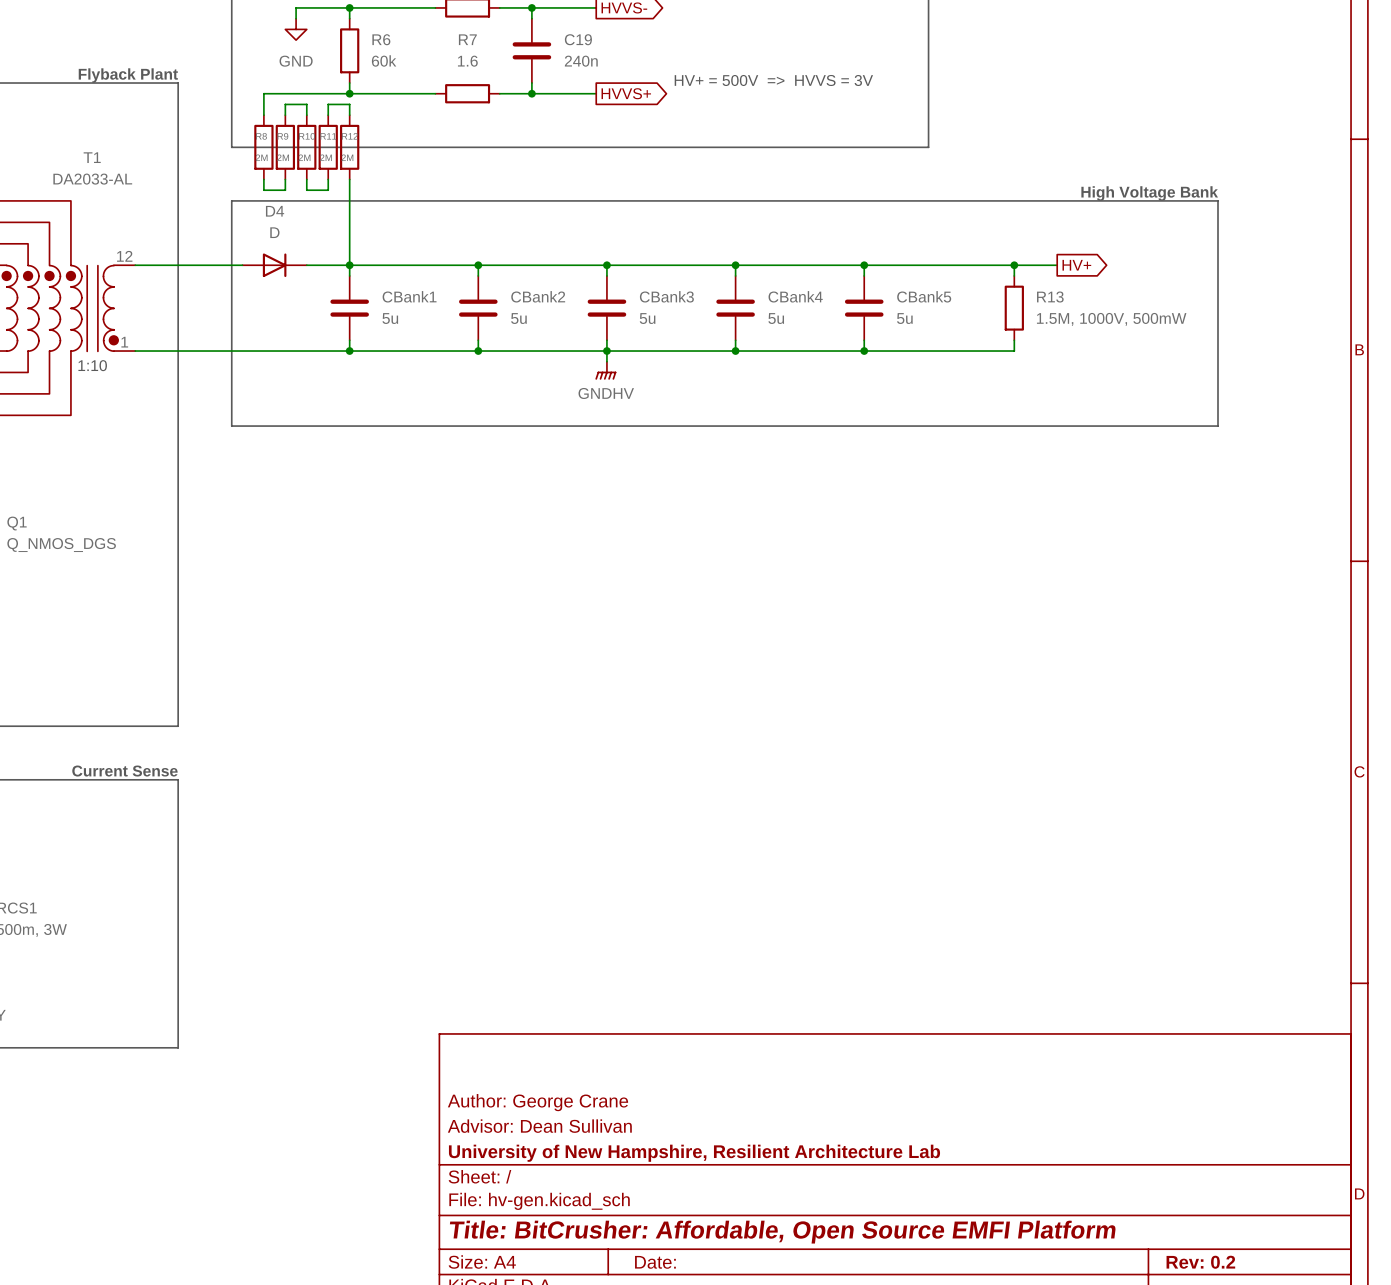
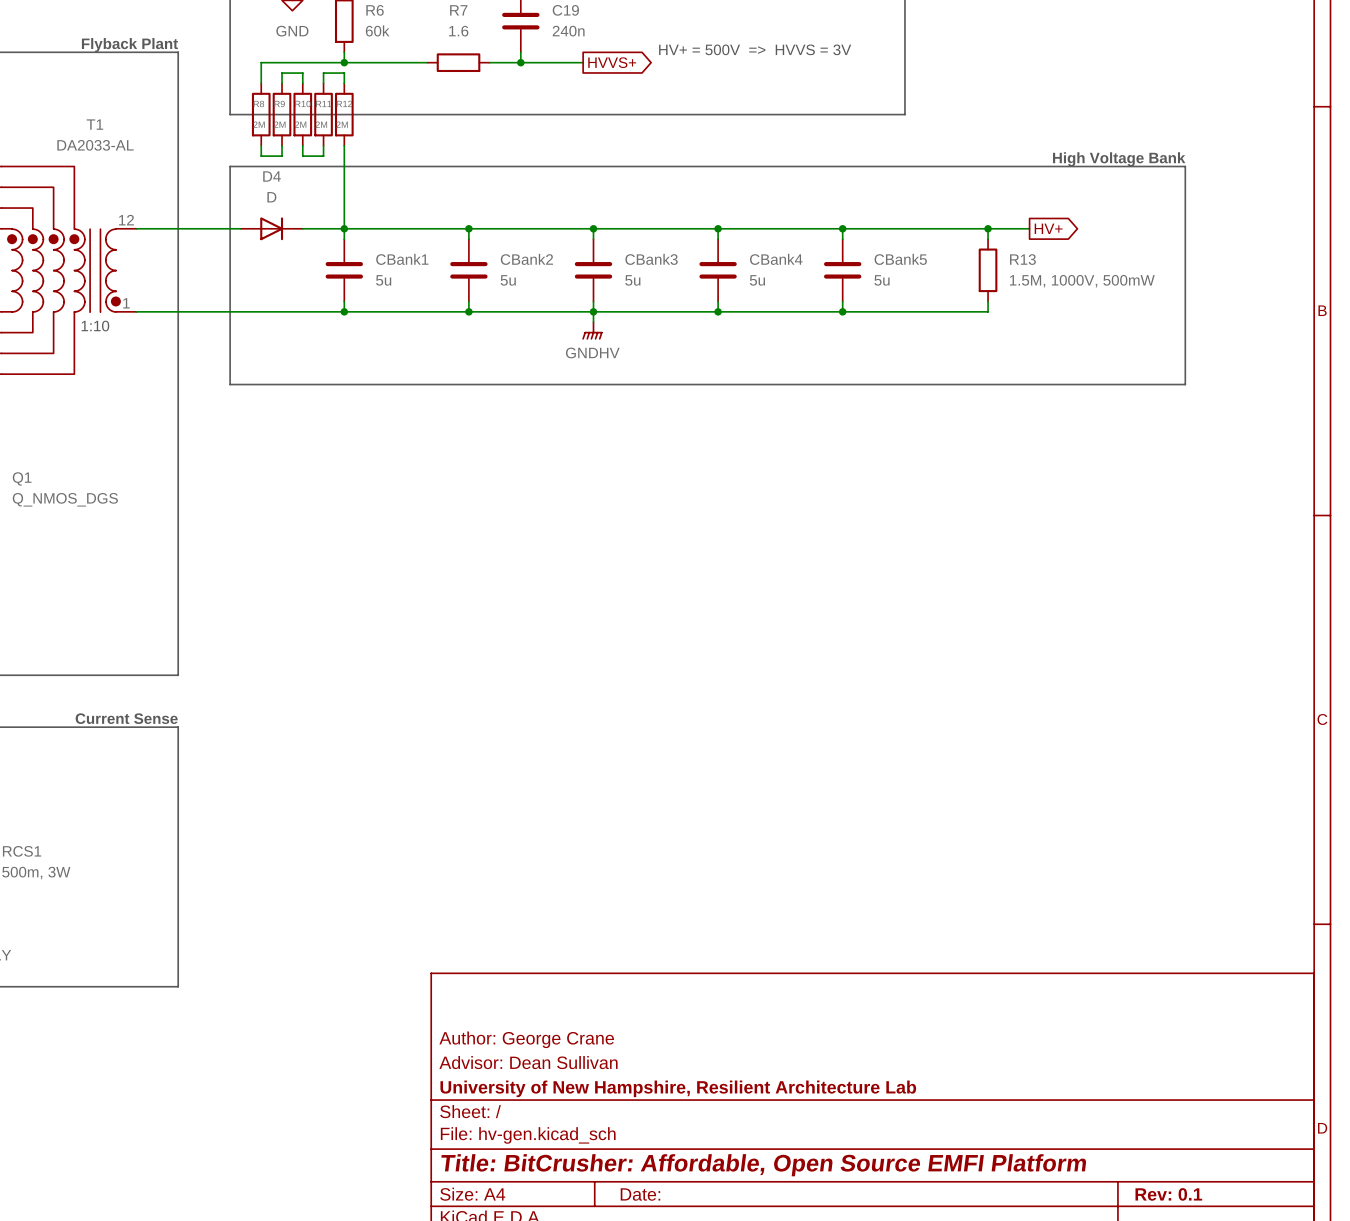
title block: Rev: 0.2 (1200, 1262) -> Rev: 0.1 (1168, 1194)

